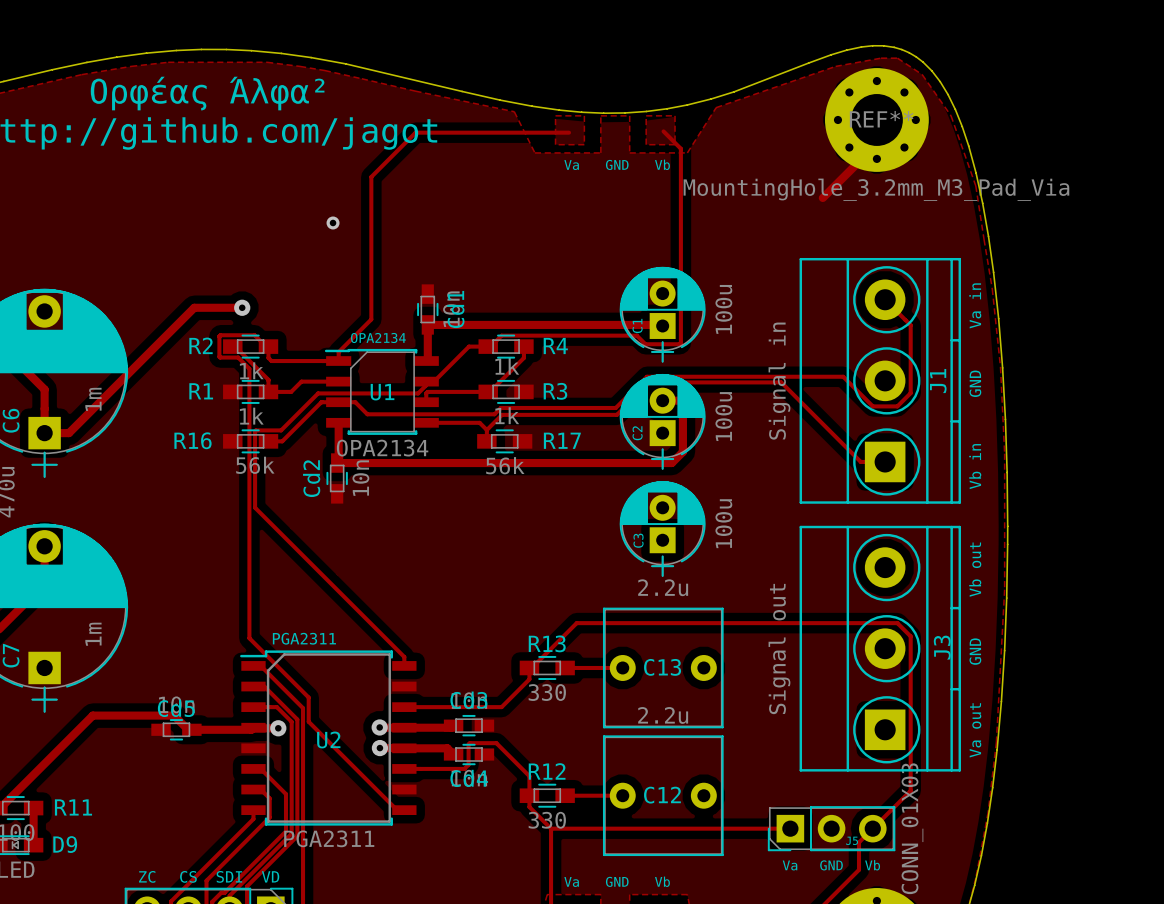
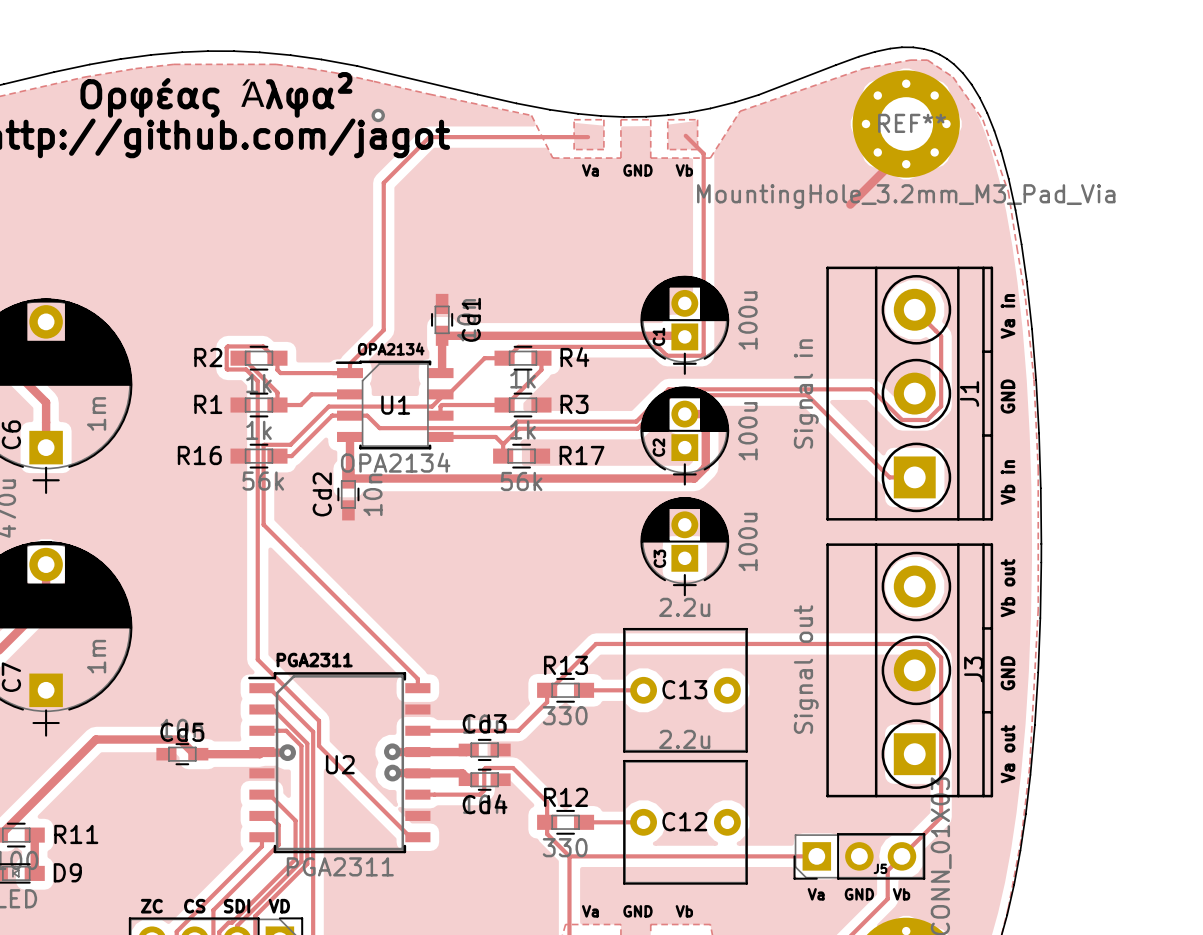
via: none -> (378, 115)
via: (333, 222) -> none
track: (242, 307) (194, 307) (68, 433) (44, 433) -> none
via: (242, 307) -> none

